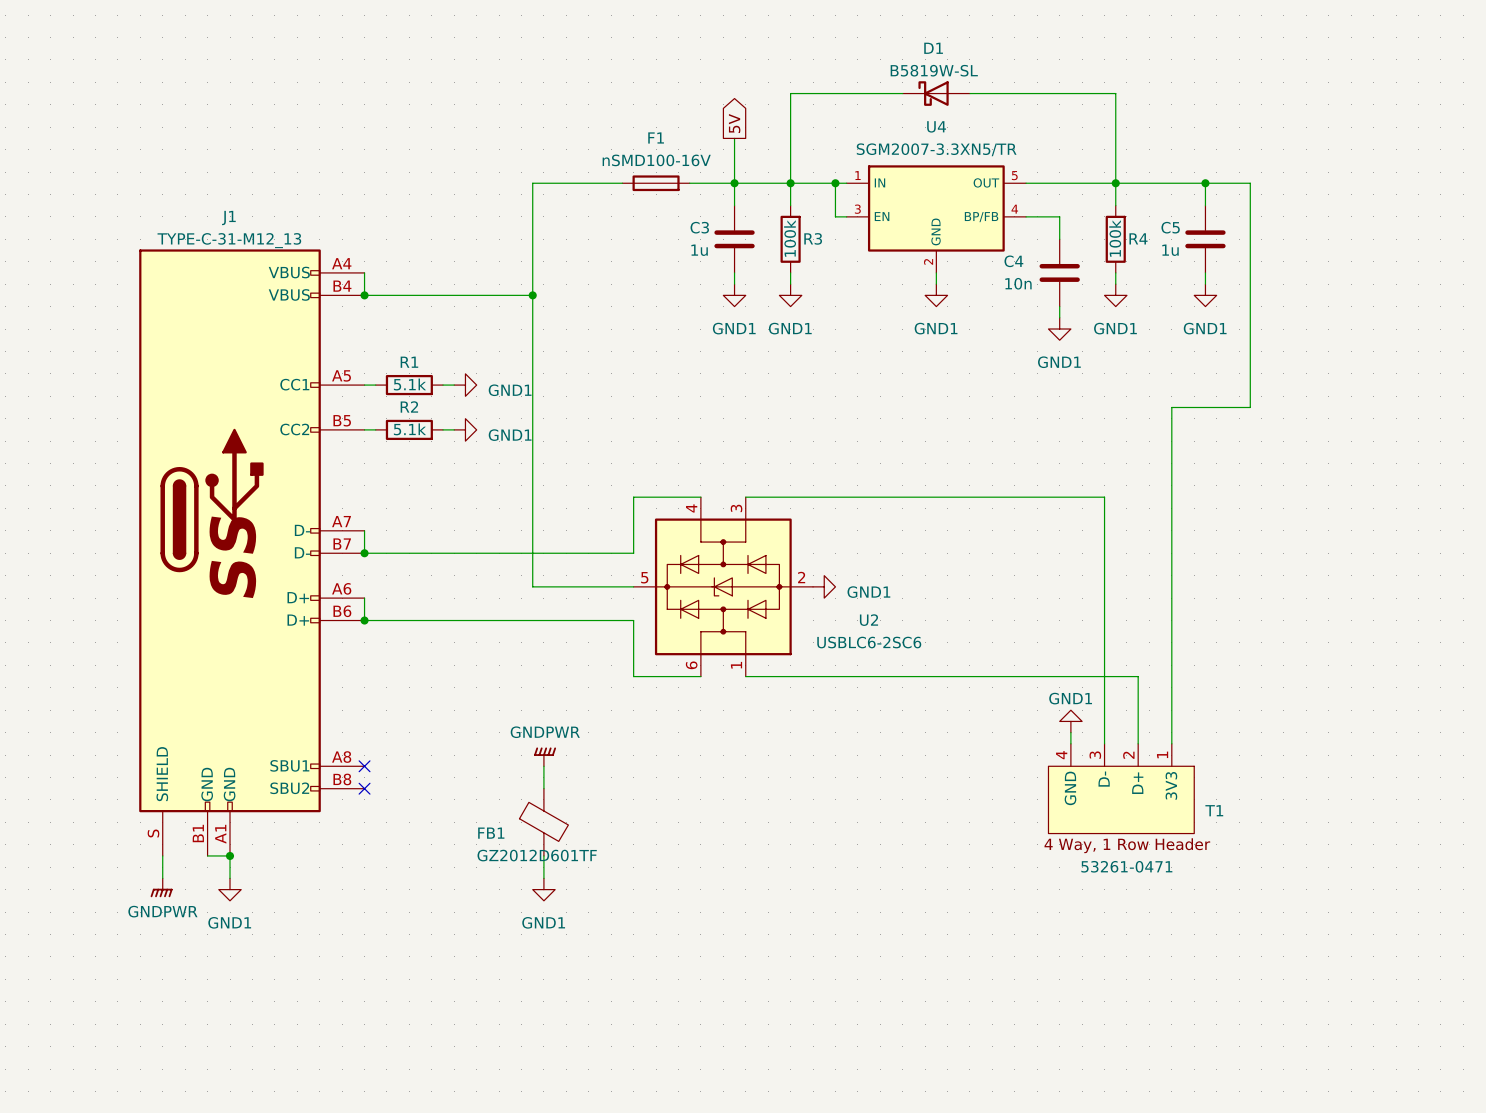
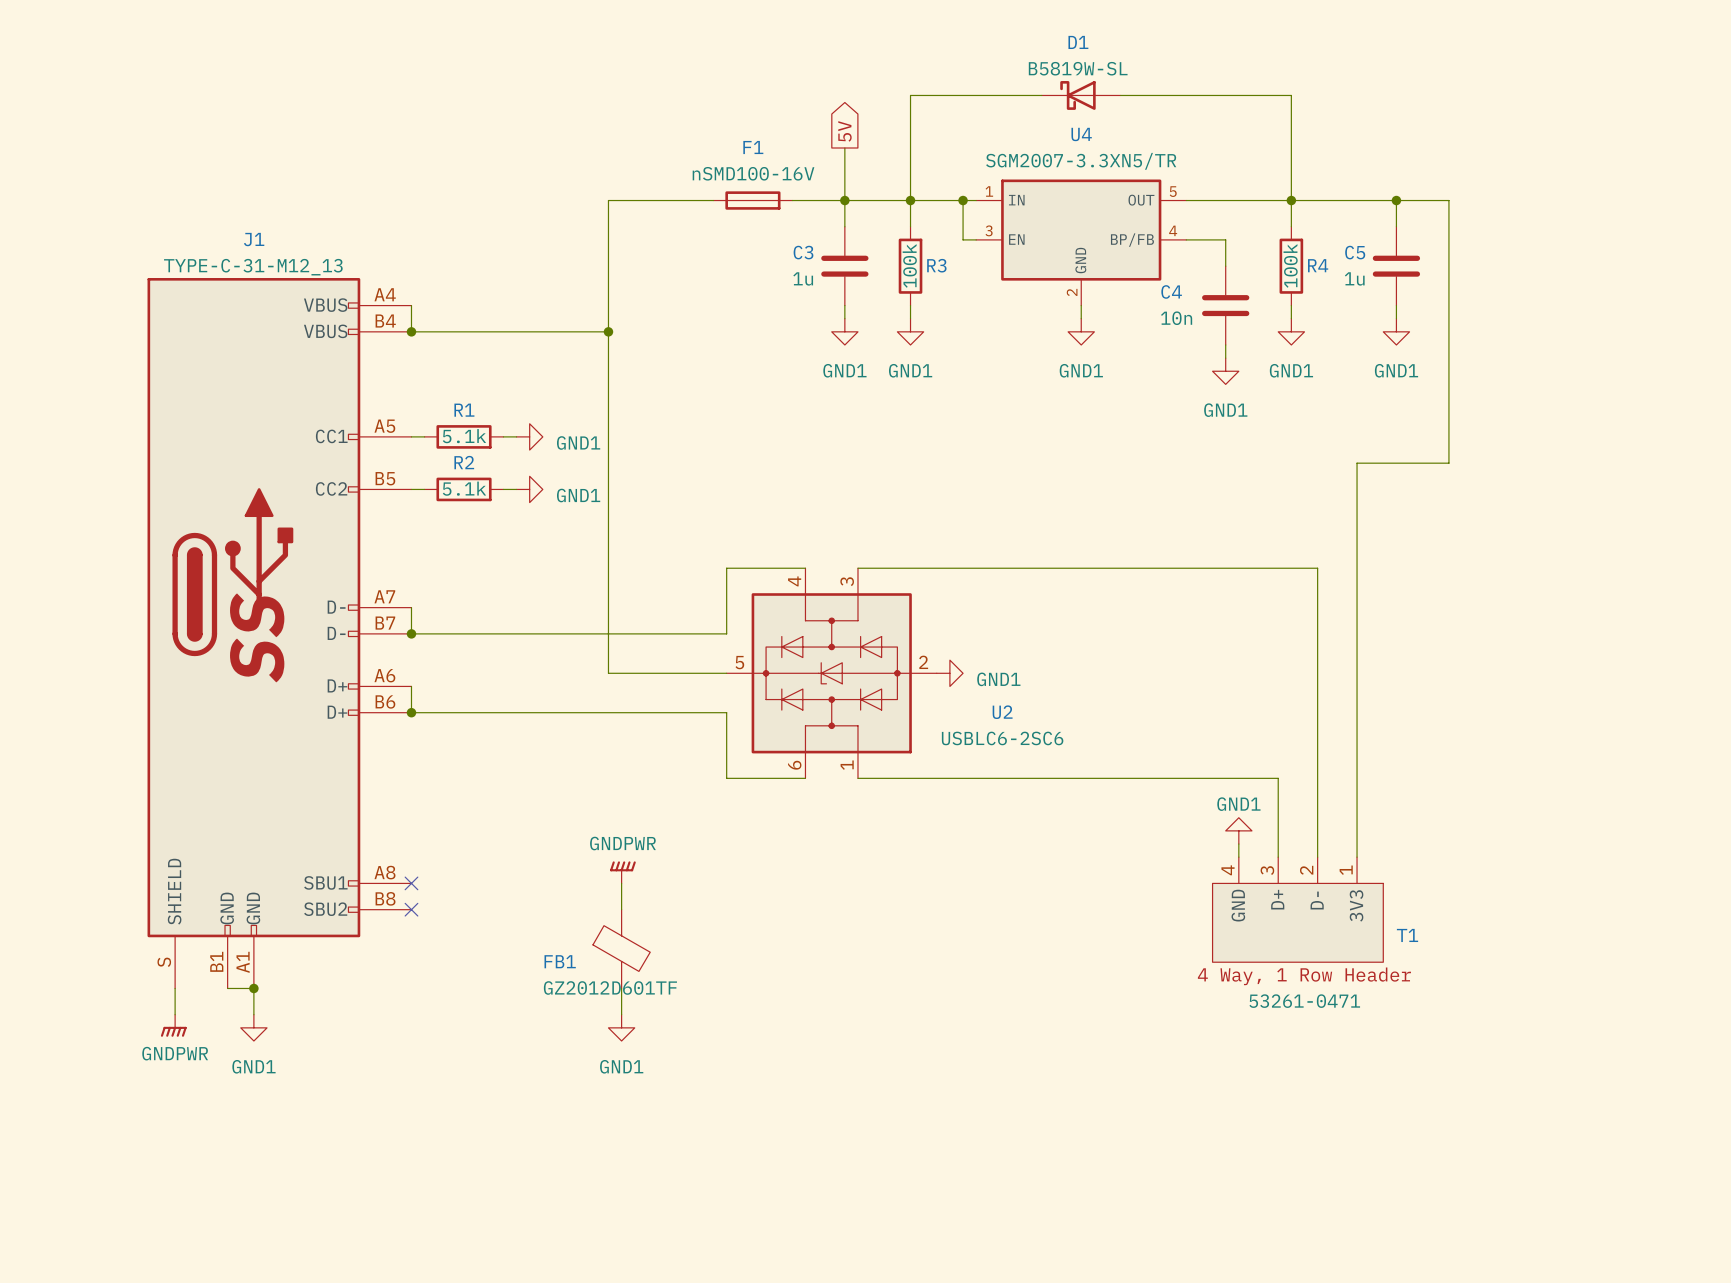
wire: (1104, 497) (1104, 676) (1138, 676) -> (1278, 568) (1317, 568) (1317, 778)
T1 pin name: D- (1104, 779) -> D+ (1277, 899)
T1 pin name: D+ (1137, 783) -> D- (1317, 900)

